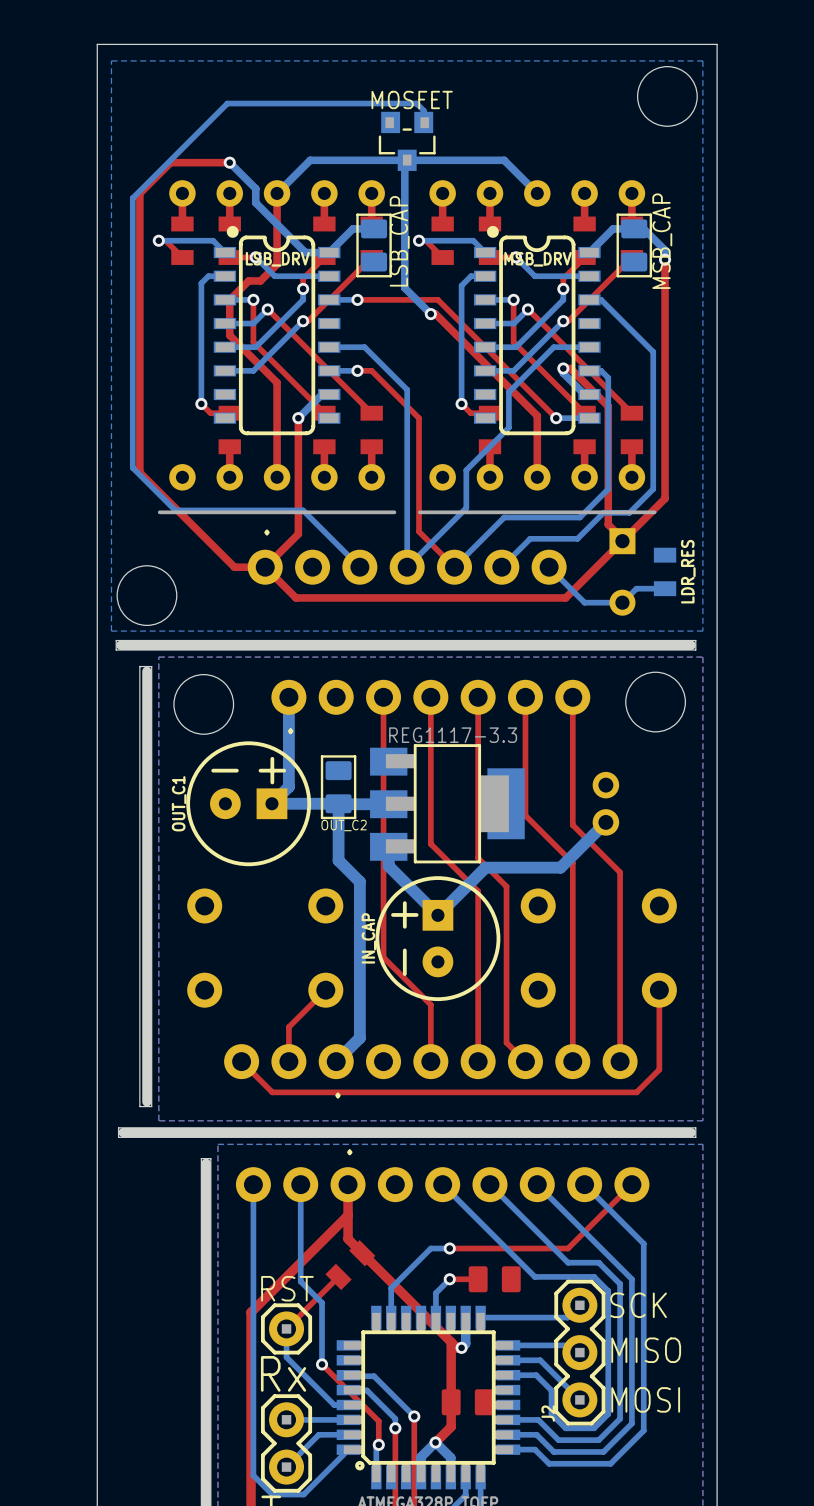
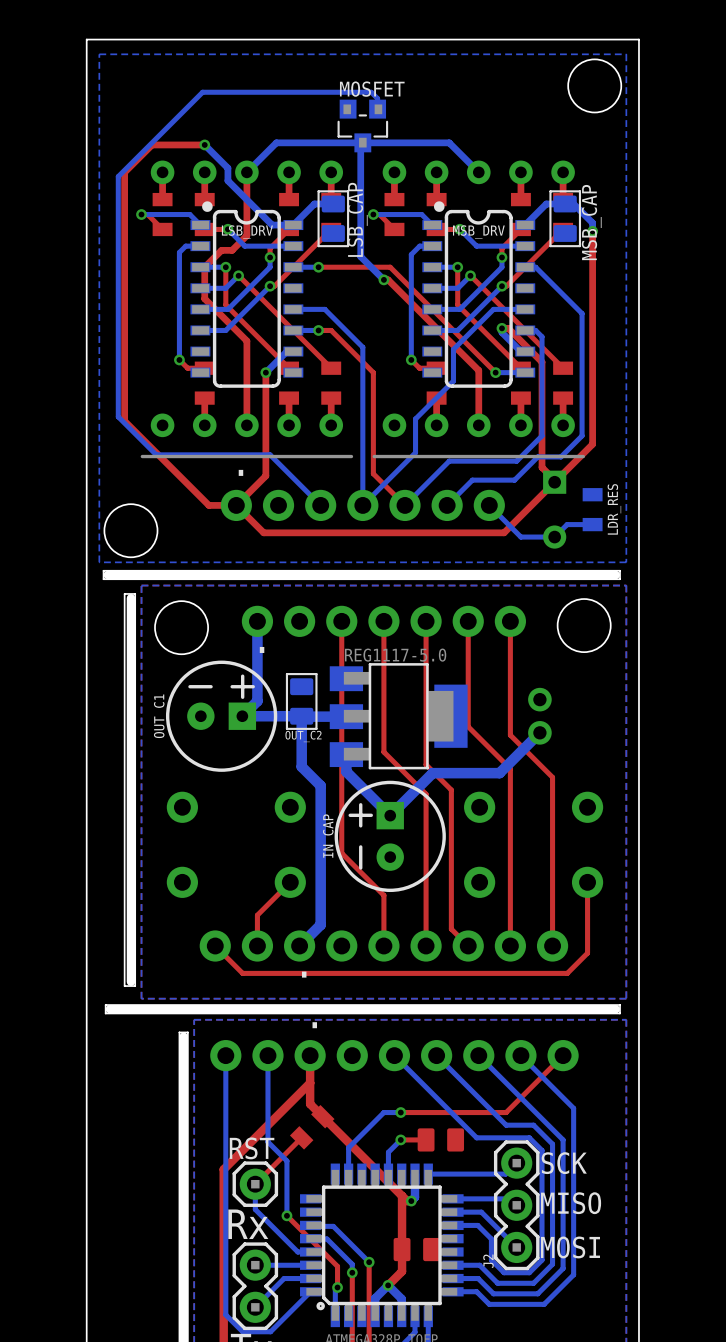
part value: REG1117-3.3 (453, 735) -> REG1117-5.0 (395, 655)

